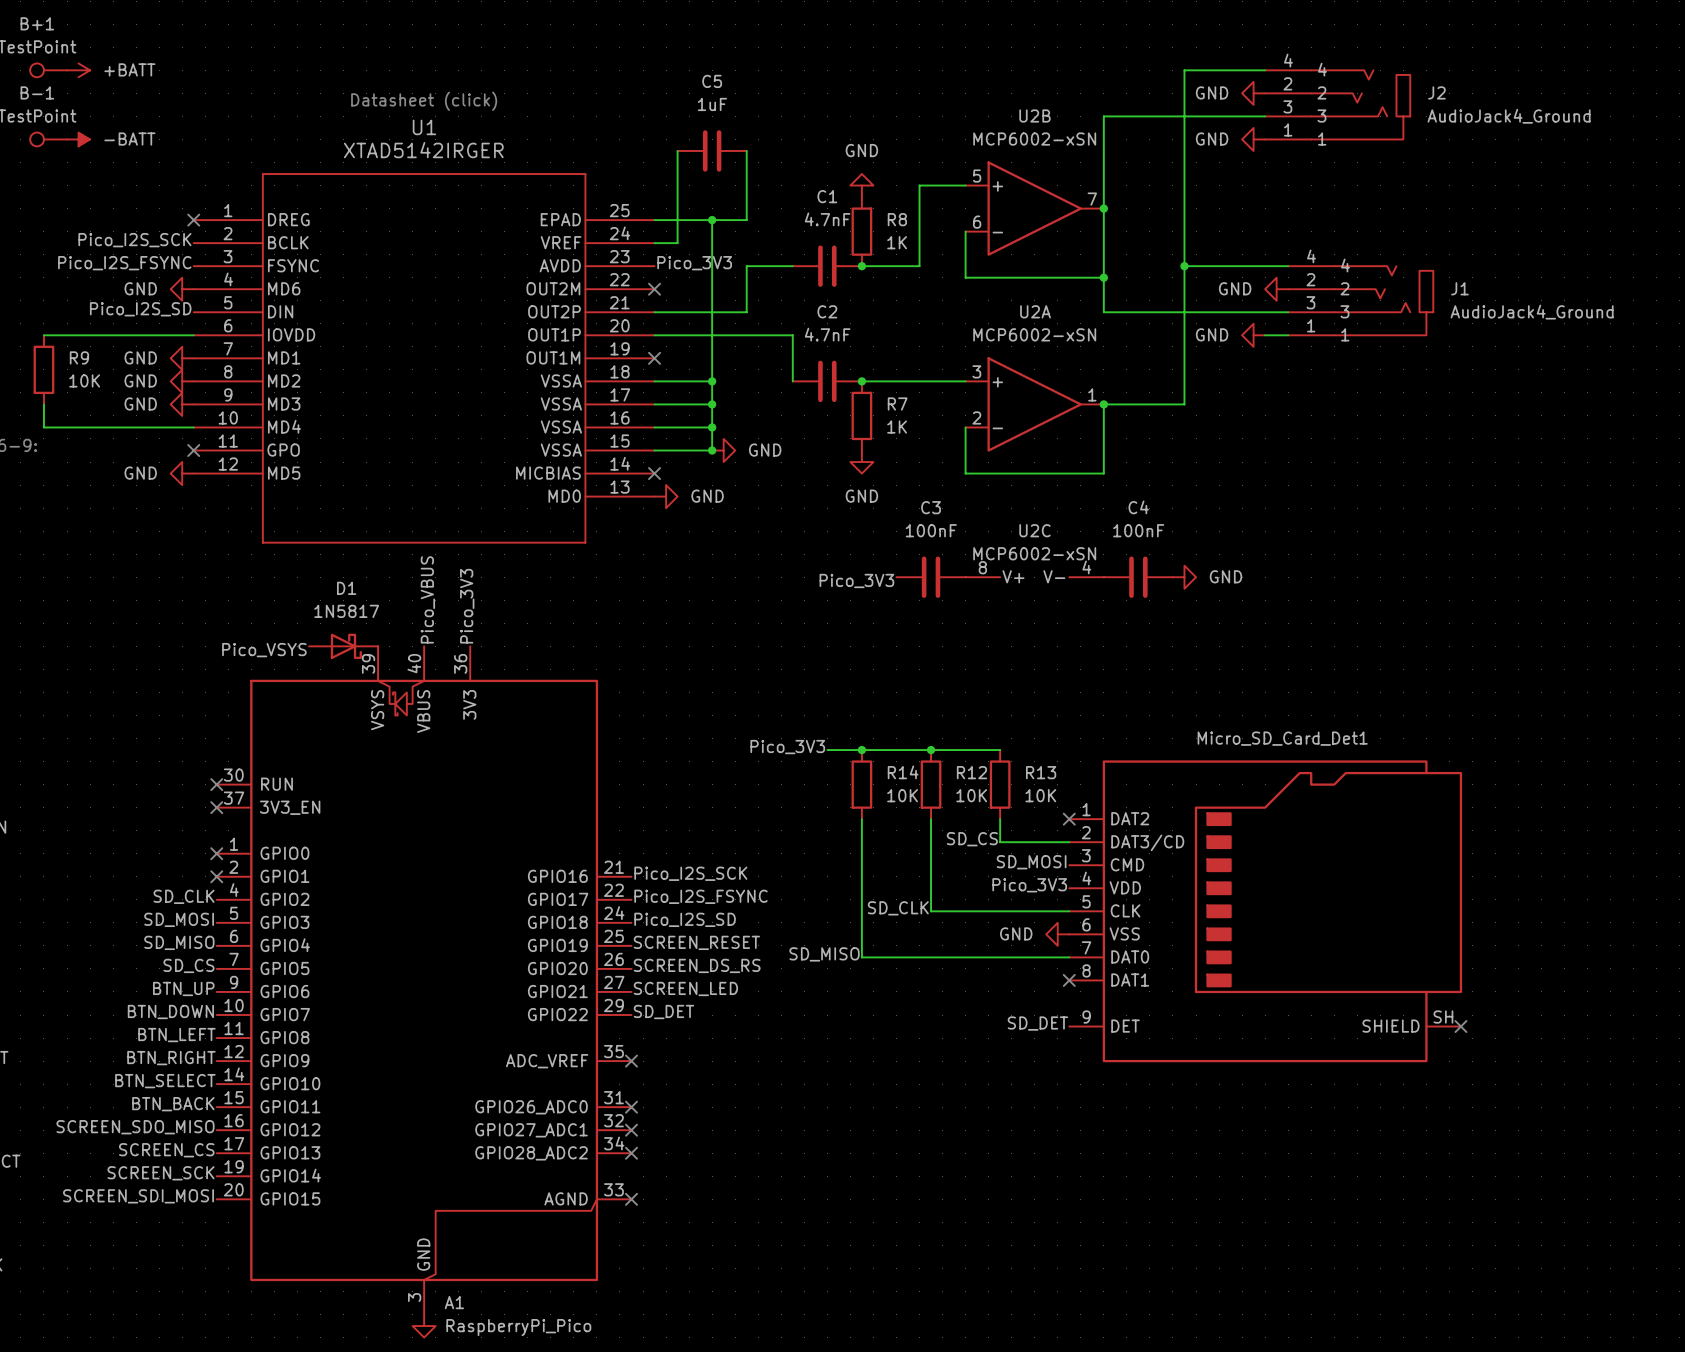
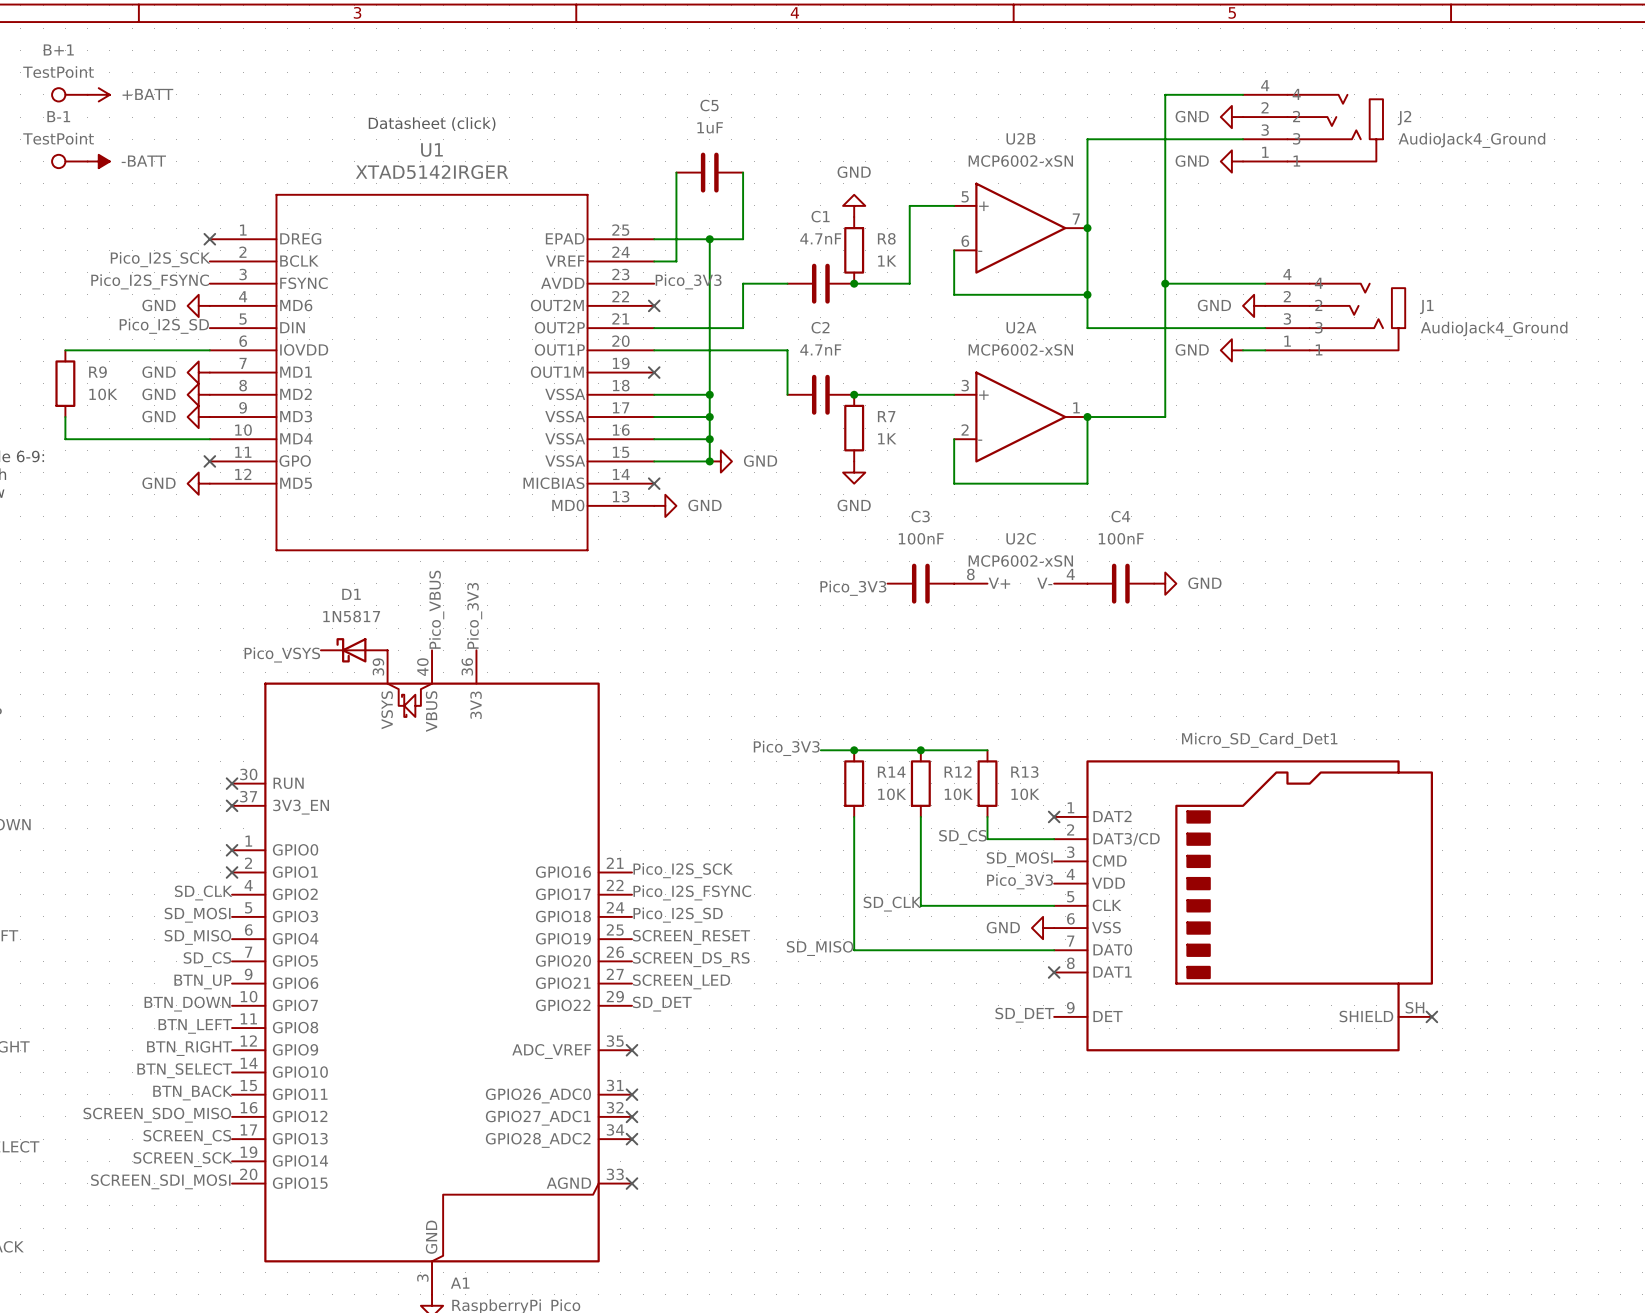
D1 rotation: 0° (346, 646) -> 180° (351, 650)

